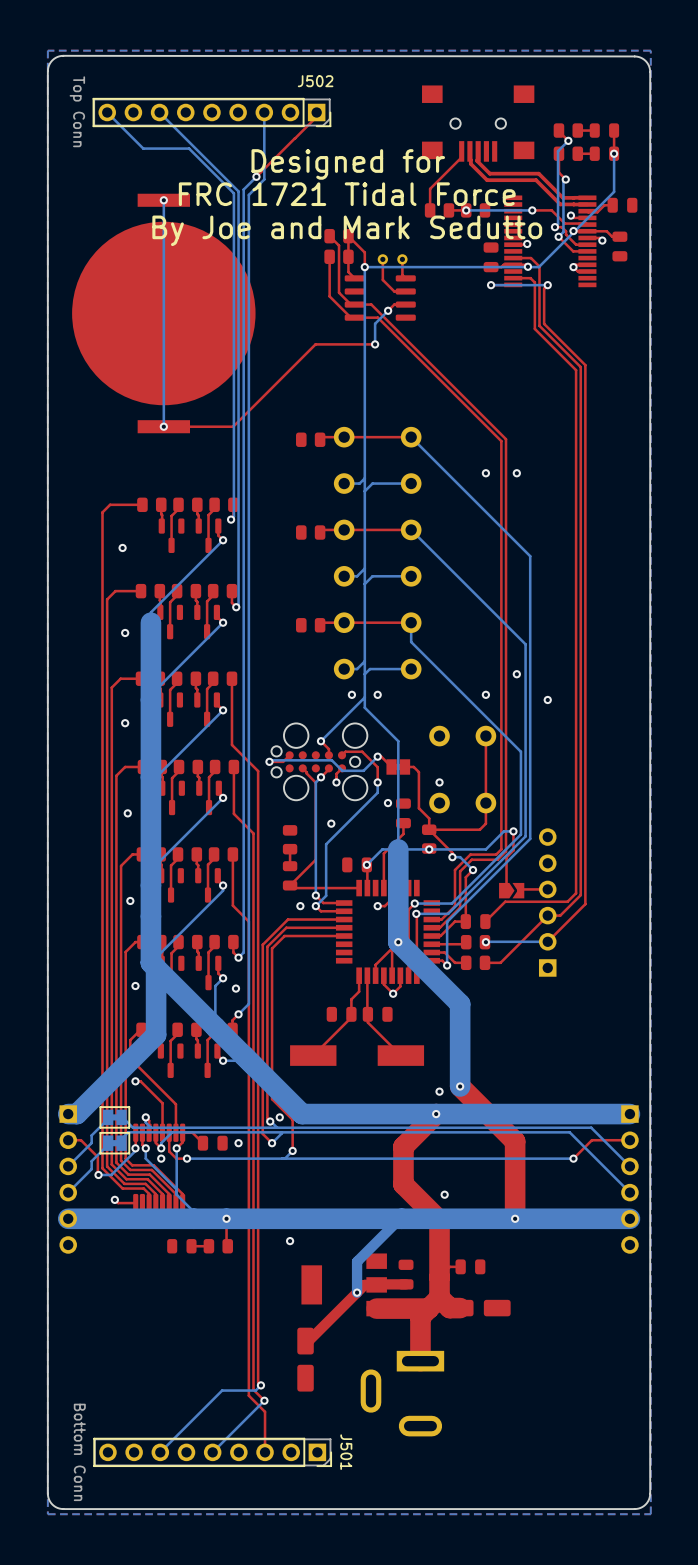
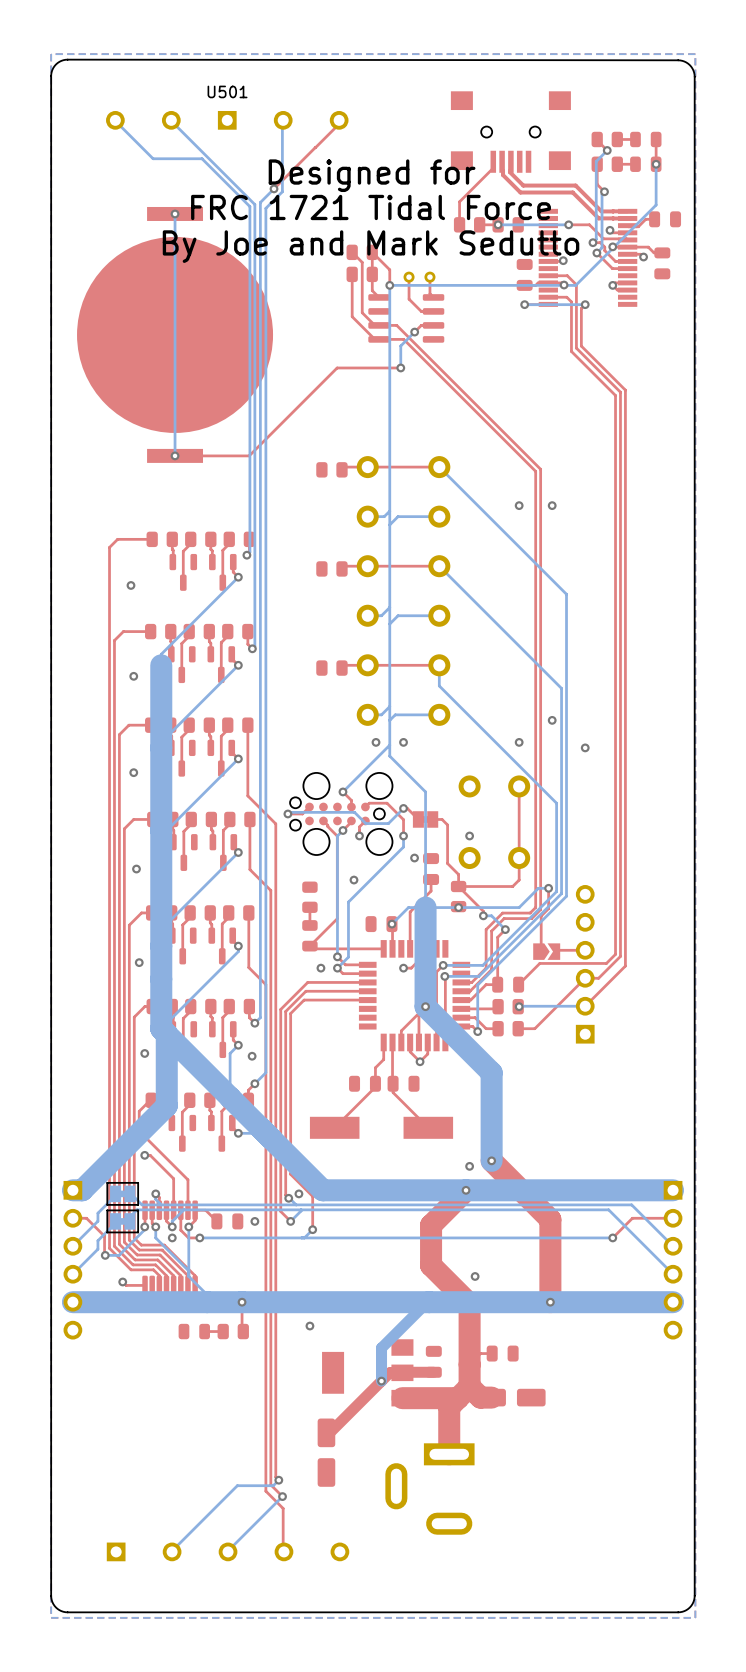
J502: Top Conn (211, 112) -> none
U501: none -> (227, 836)
J501: Bottom Conn (212, 1452) -> none

